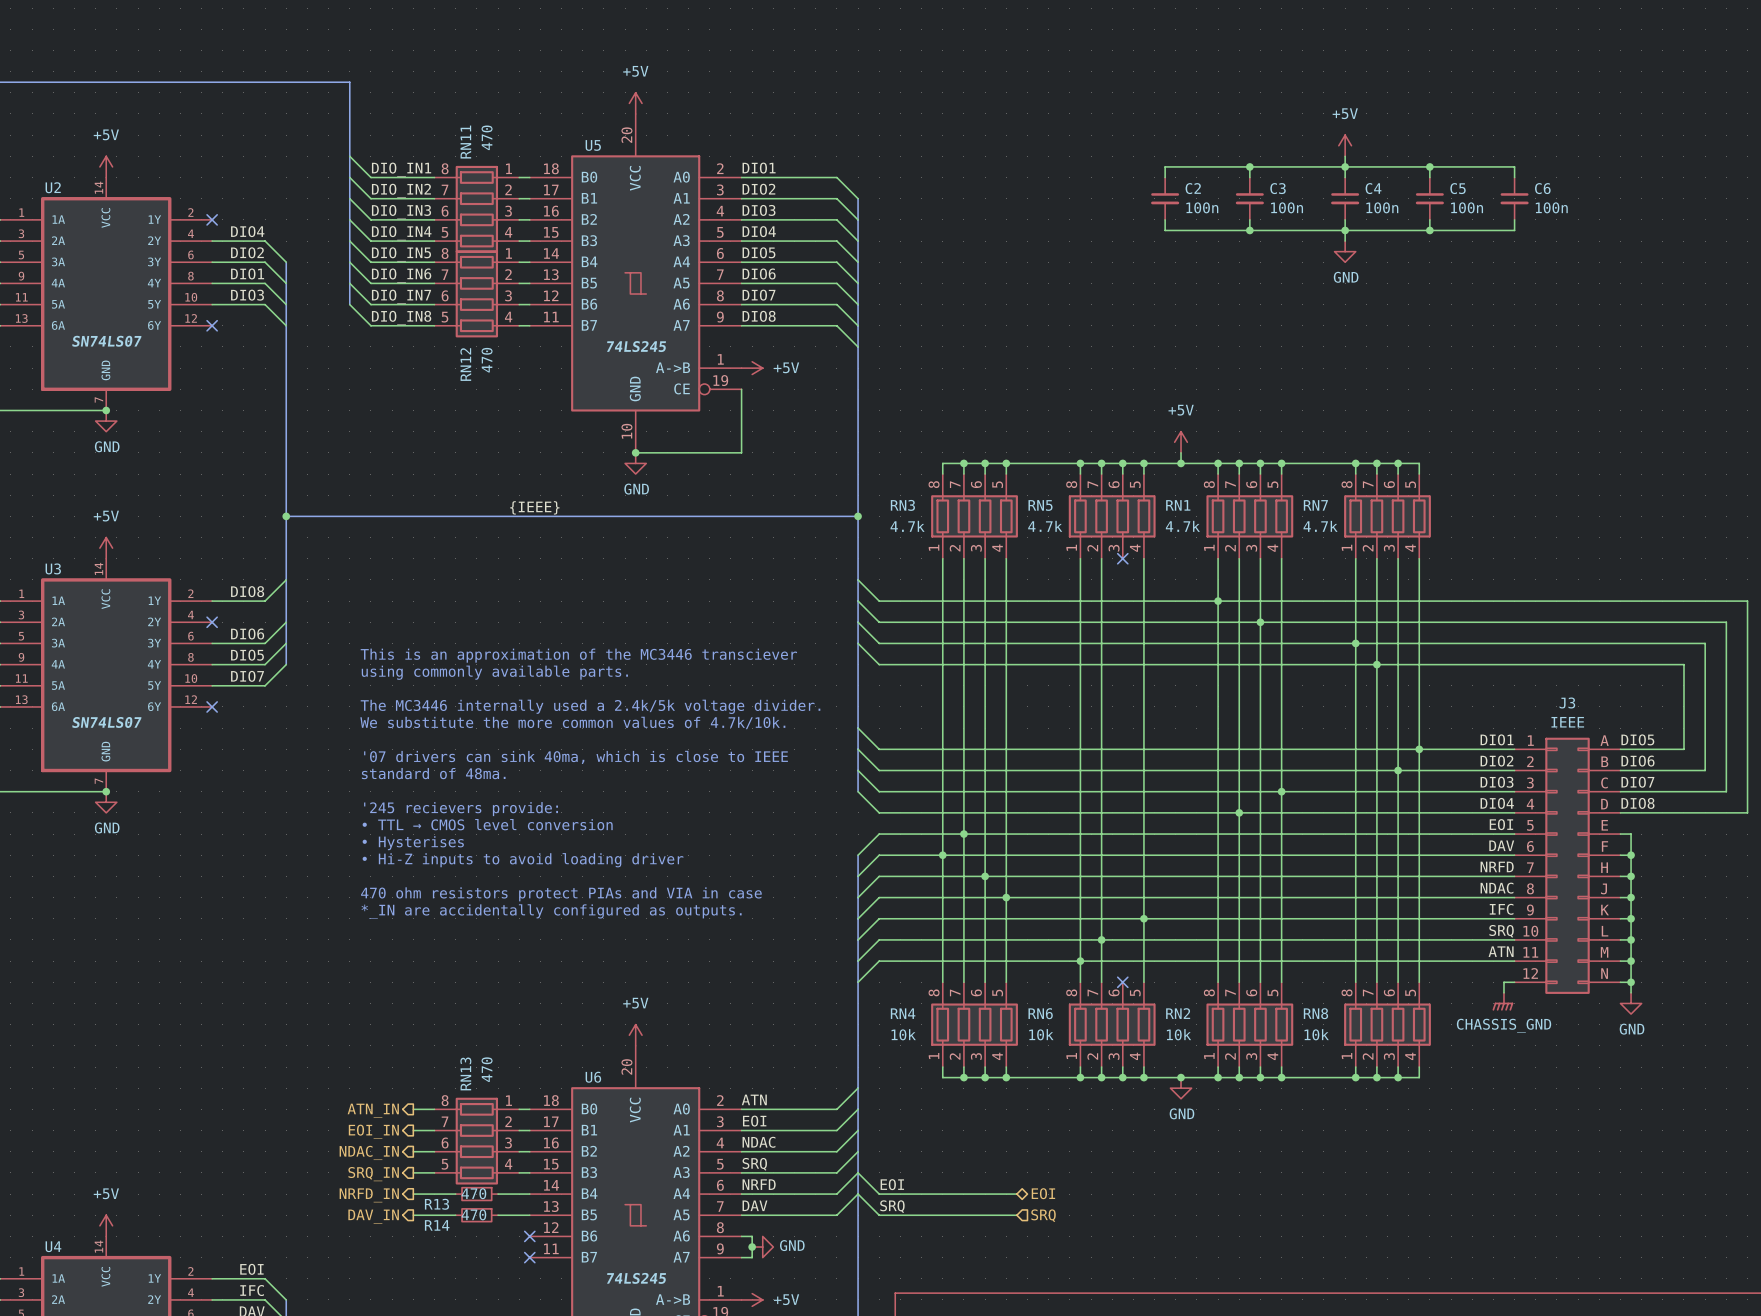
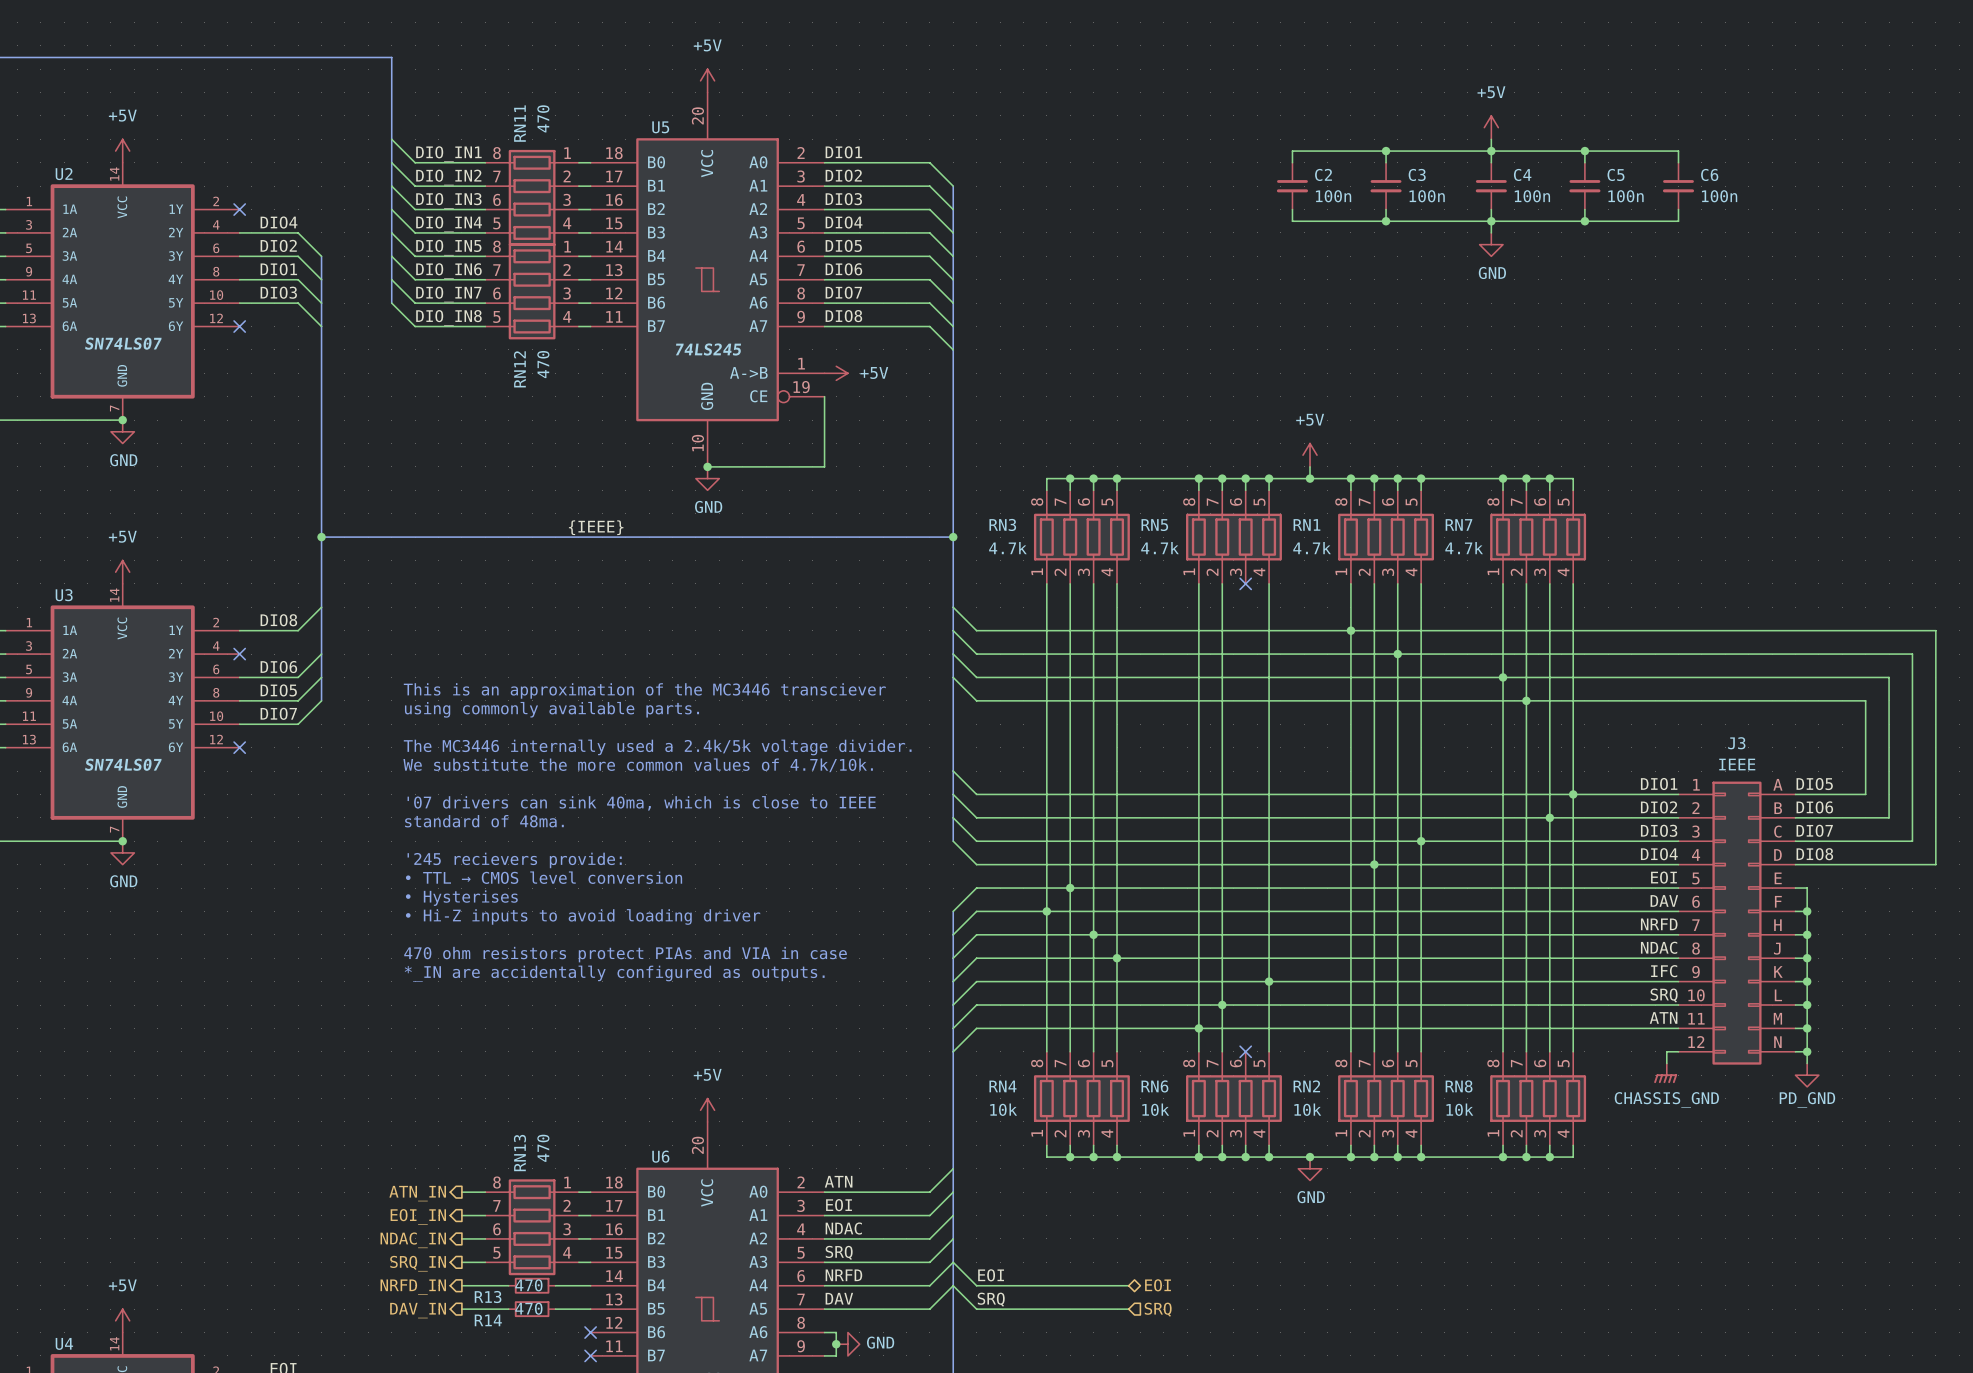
power symbol: GND (1631, 1003) -> PD_GND (1807, 1075)

